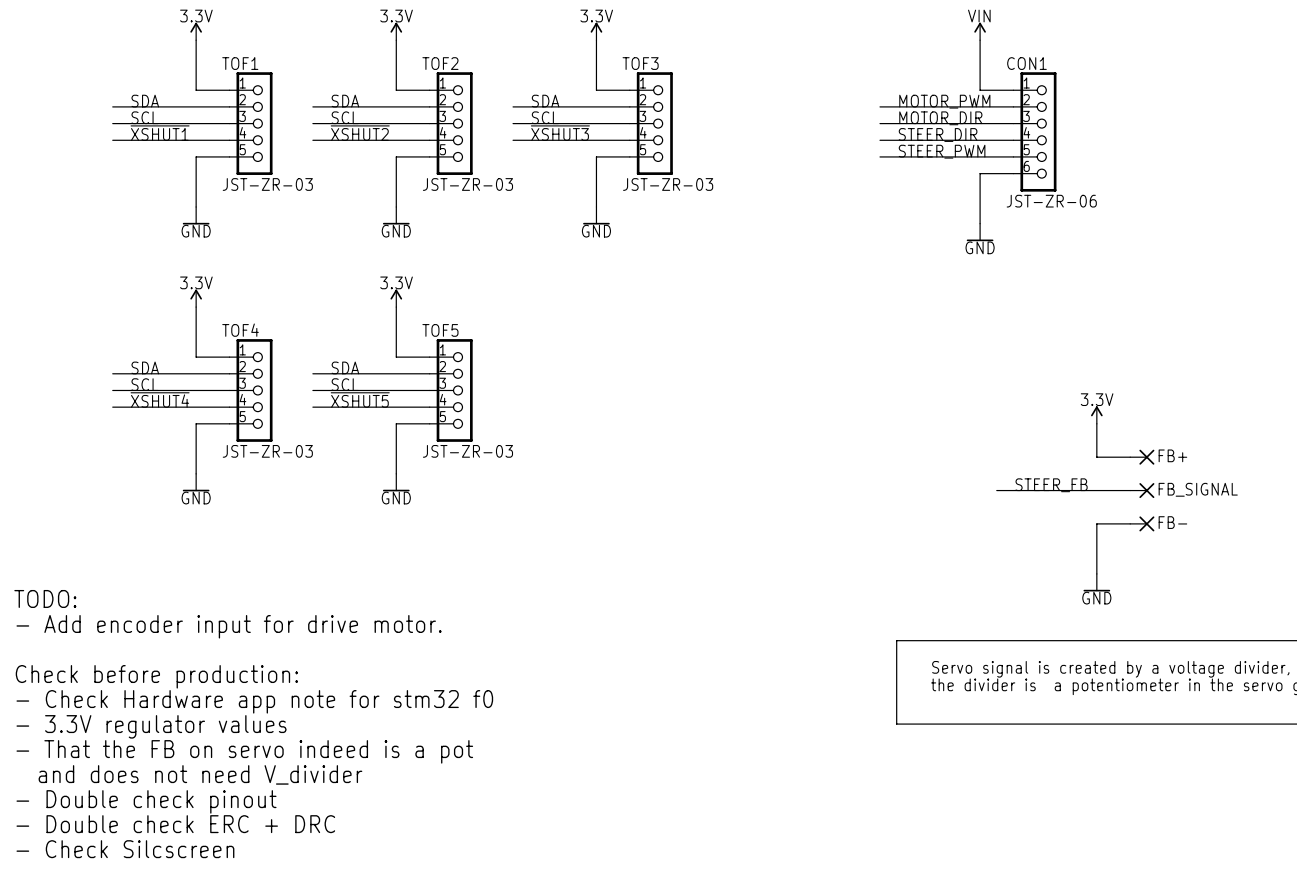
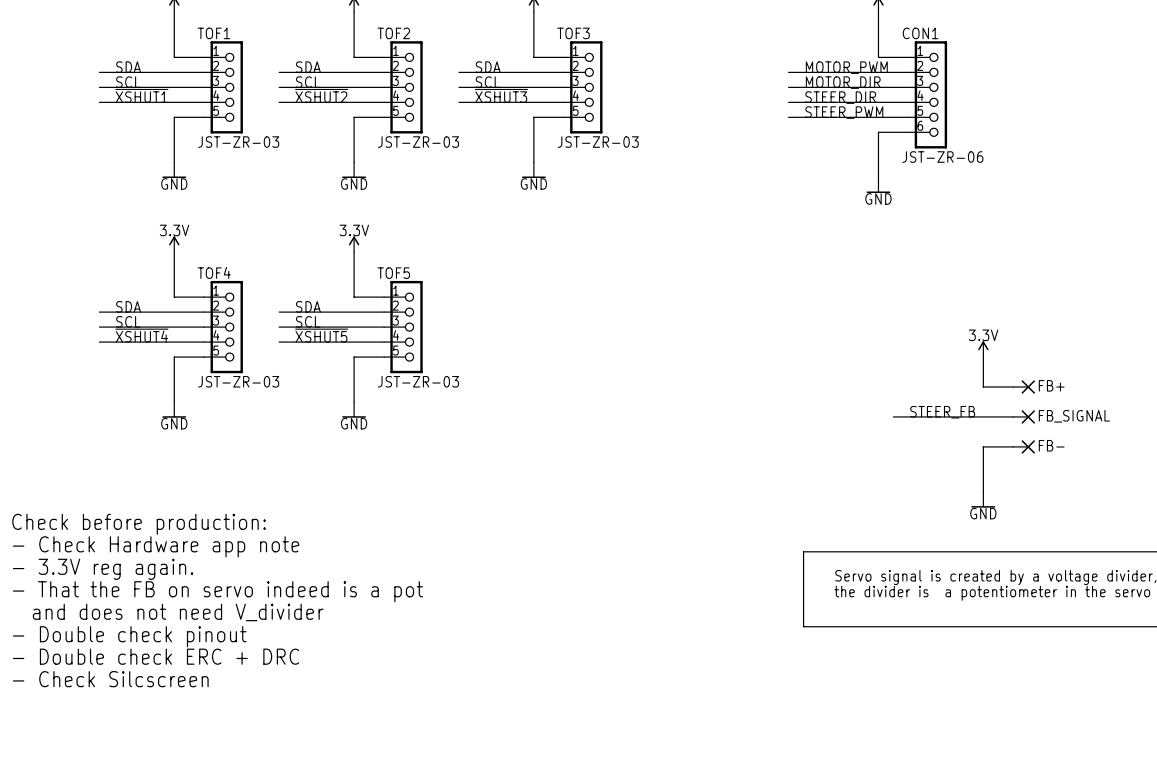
text: TODO: (45, 598) -> none
text: - Add encoder input for drive motor. (229, 626) -> none
text: none -> - Check Hardware app note (156, 546)
text: none -> - 3.3V reg again. (103, 569)
text position: Check before production: (156, 676) -> Check before production: (139, 524)
text: - Check Hardware app note for stm32 f0 (254, 701) -> none
text: - 3.3V regulator values (151, 726) -> none
text position: - That the FB on servo indeed is a pot (244, 751) -> - That the FB on servo indeed is a pot (218, 591)
text position: and does not need V_divider (200, 774) -> and does not need V_divider (178, 612)
text position: - Double check pinout (146, 801) -> - Double check pinout (129, 636)
text position: - Double check ERC + DRC (175, 824) -> - Double check ERC + DRC (156, 656)
text position: - Check Silcscreen (125, 849) -> - Check Silcscreen (110, 679)

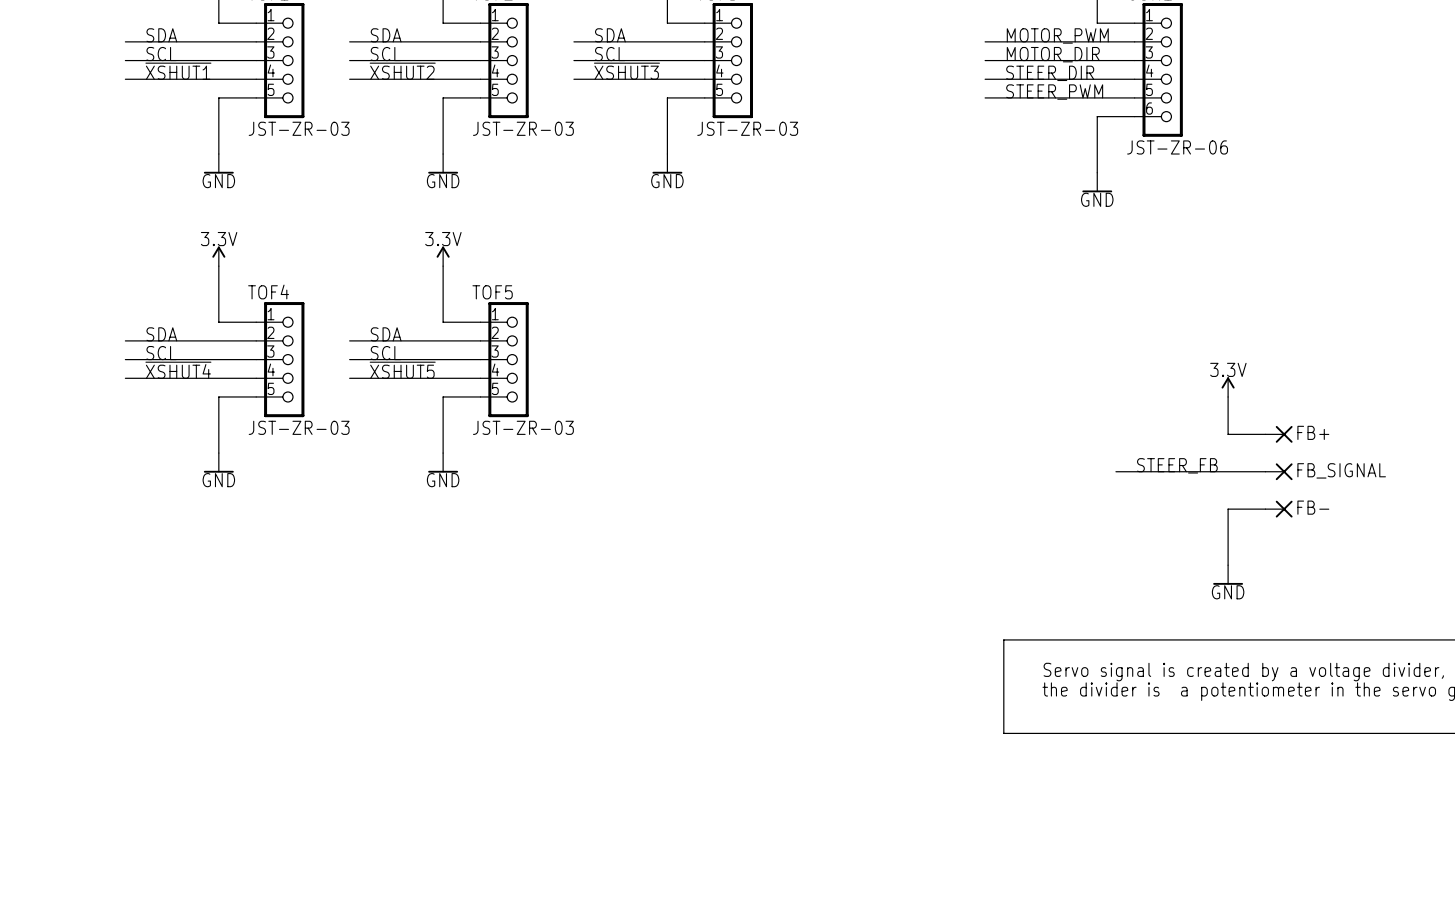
text: Check before production: (139, 524) -> none
text: - Check Hardware app note (156, 546) -> none
text: - 3.3V reg again. (103, 569) -> none
text: - That the FB on servo indeed is a pot (218, 591) -> none
text: and does not need V_divider (178, 612) -> none
text: - Double check pinout (129, 636) -> none
text: - Double check ERC + DRC (156, 656) -> none
text: - Check Silcscreen (110, 679) -> none

